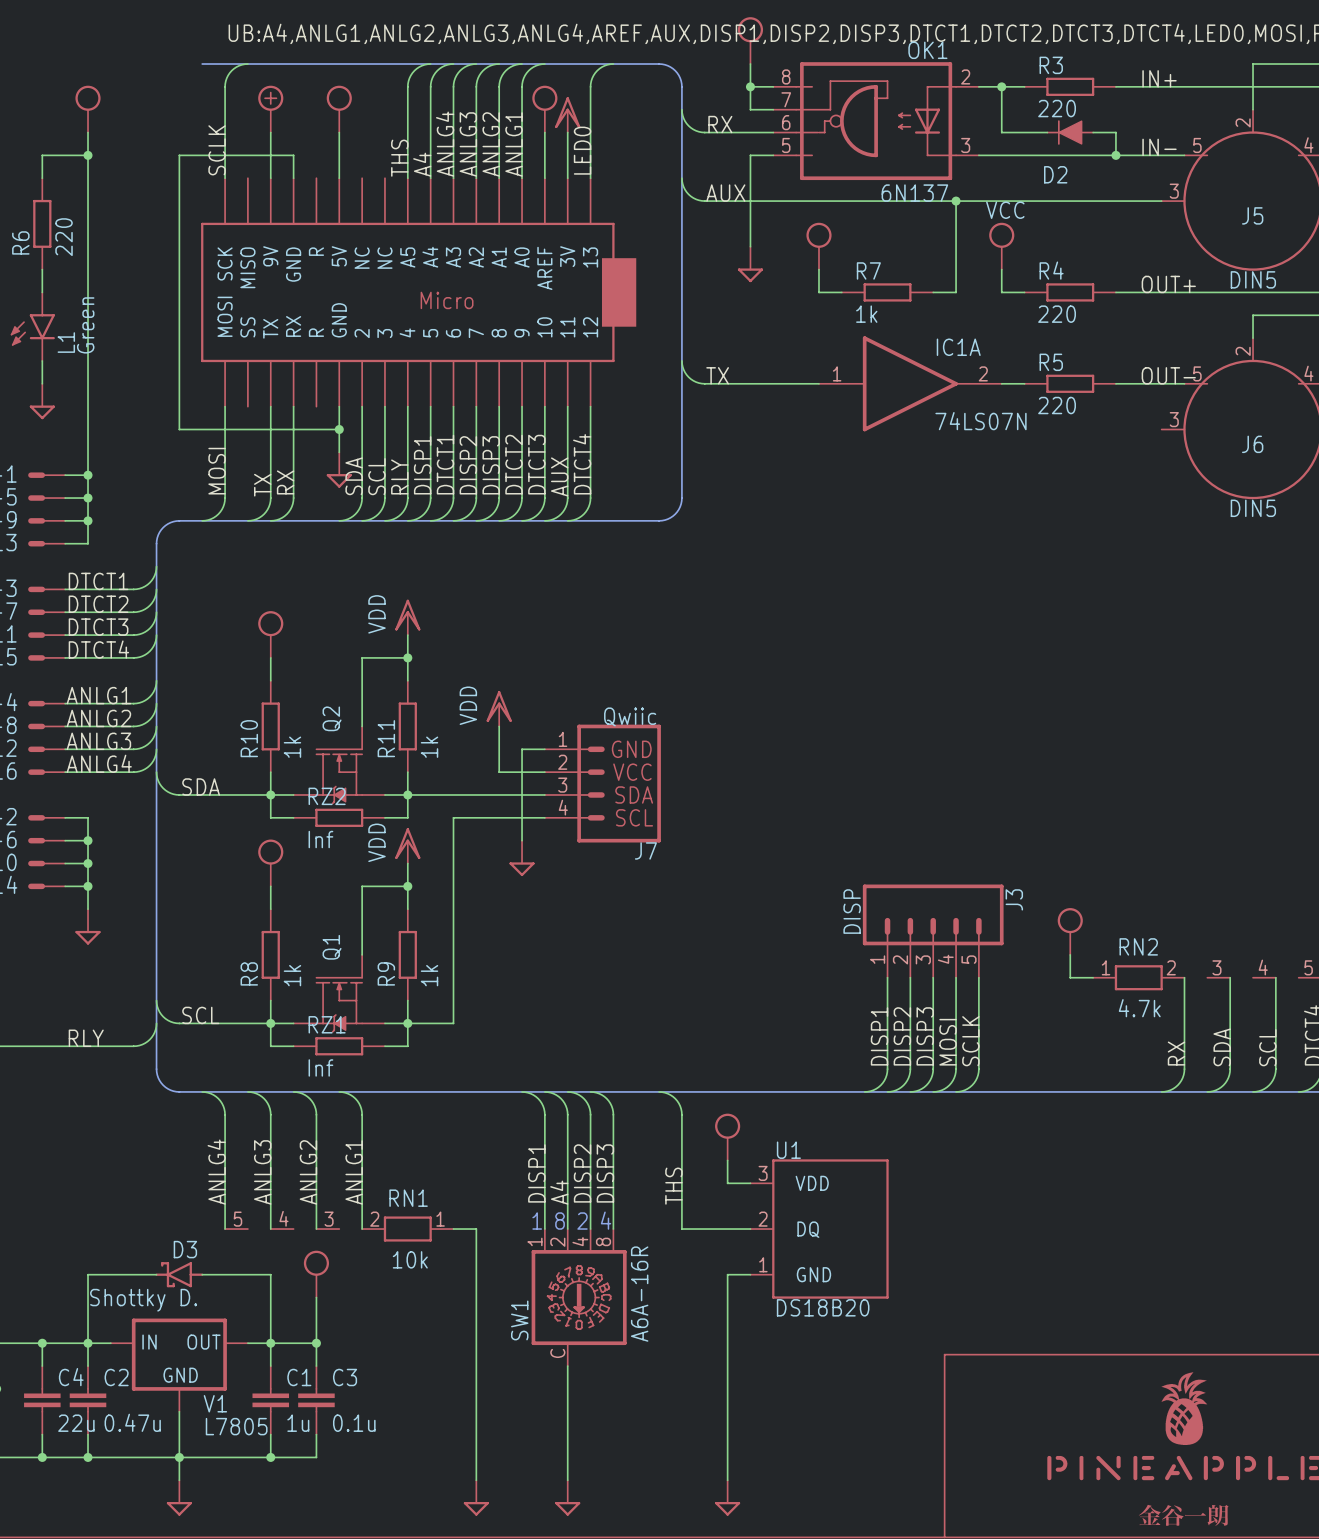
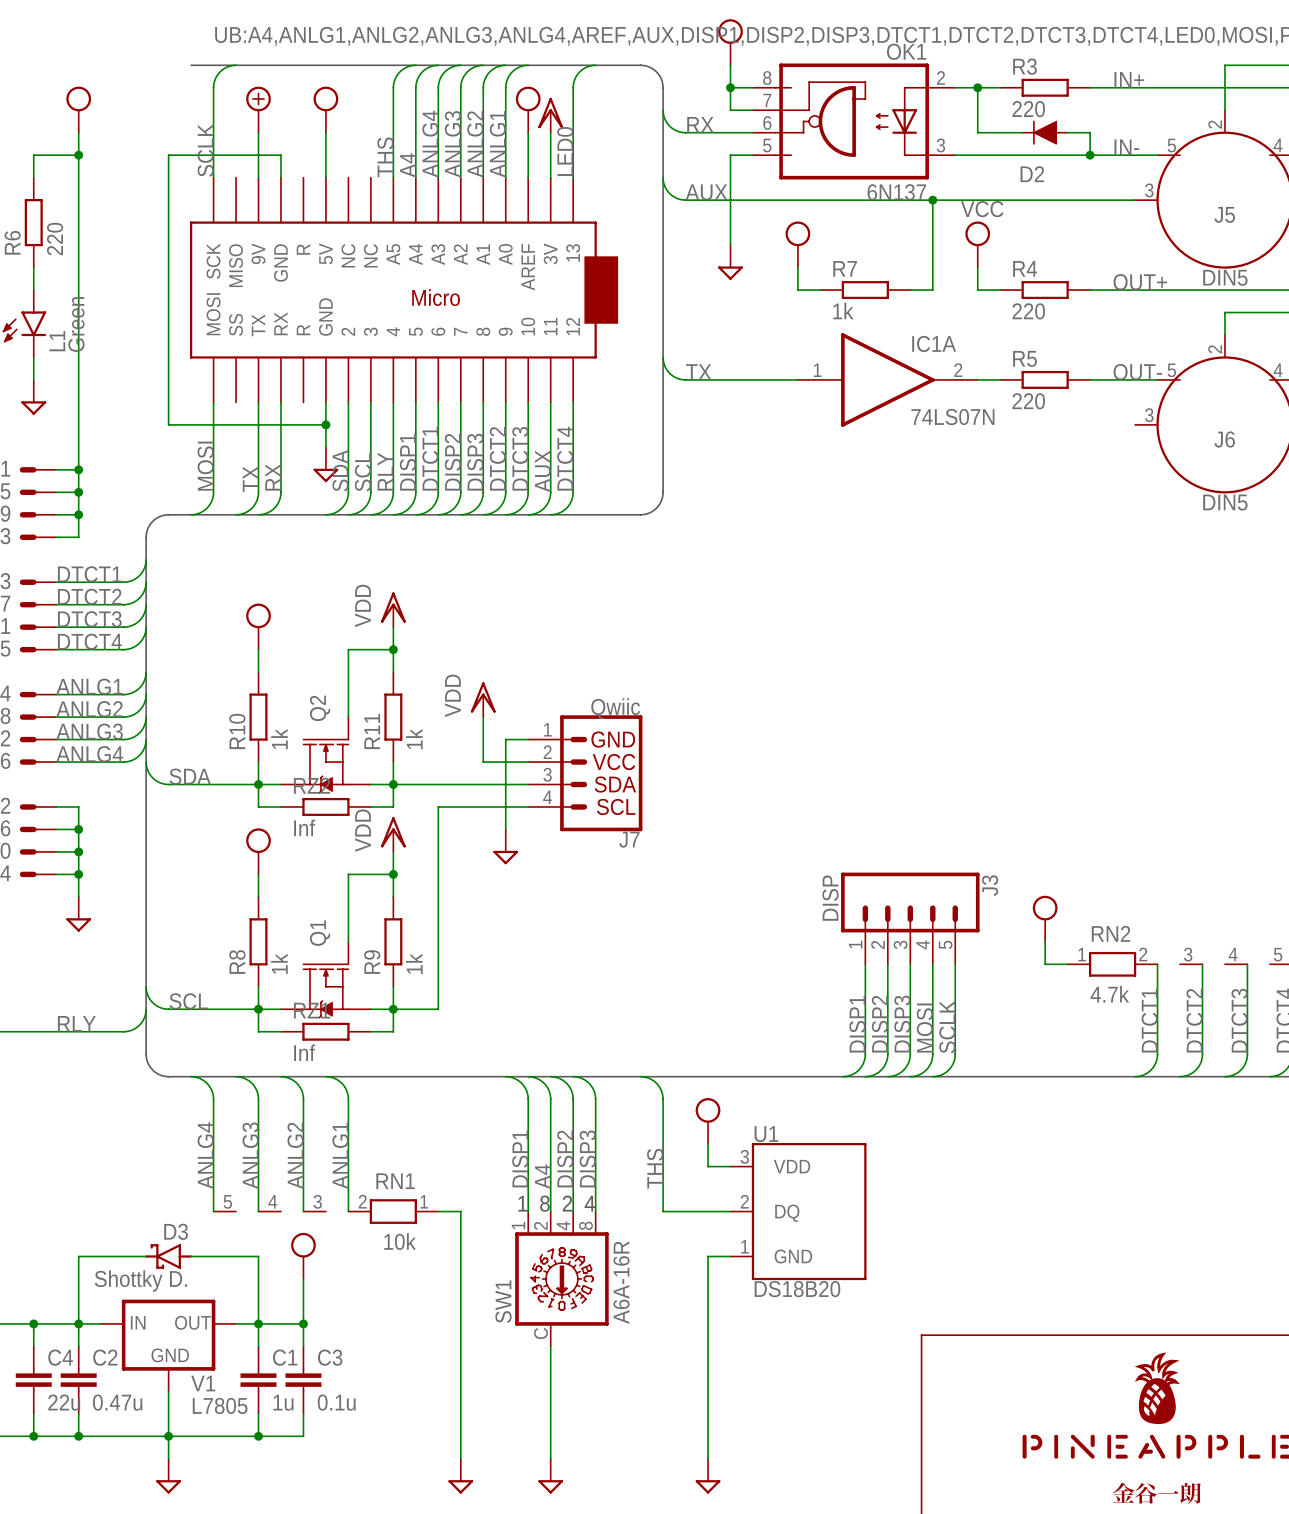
label: SDA (1222, 1047) -> DTCT2 (1194, 1020)
label: SCL (1267, 1047) -> DTCT3 (1239, 1020)
label: RX (1176, 1053) -> DTCT1 (1149, 1020)

